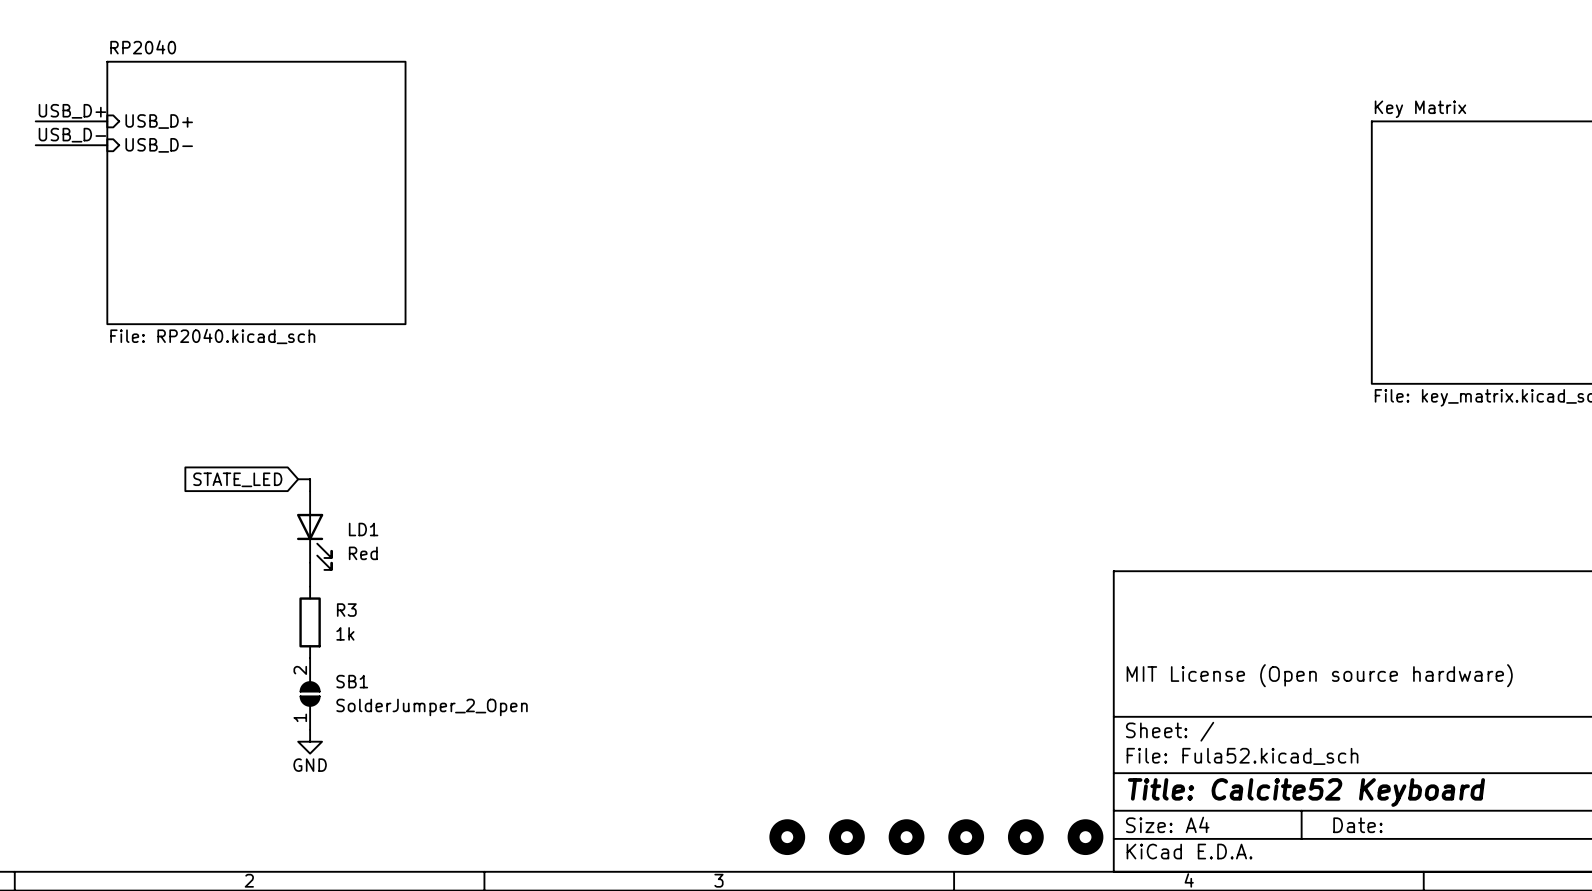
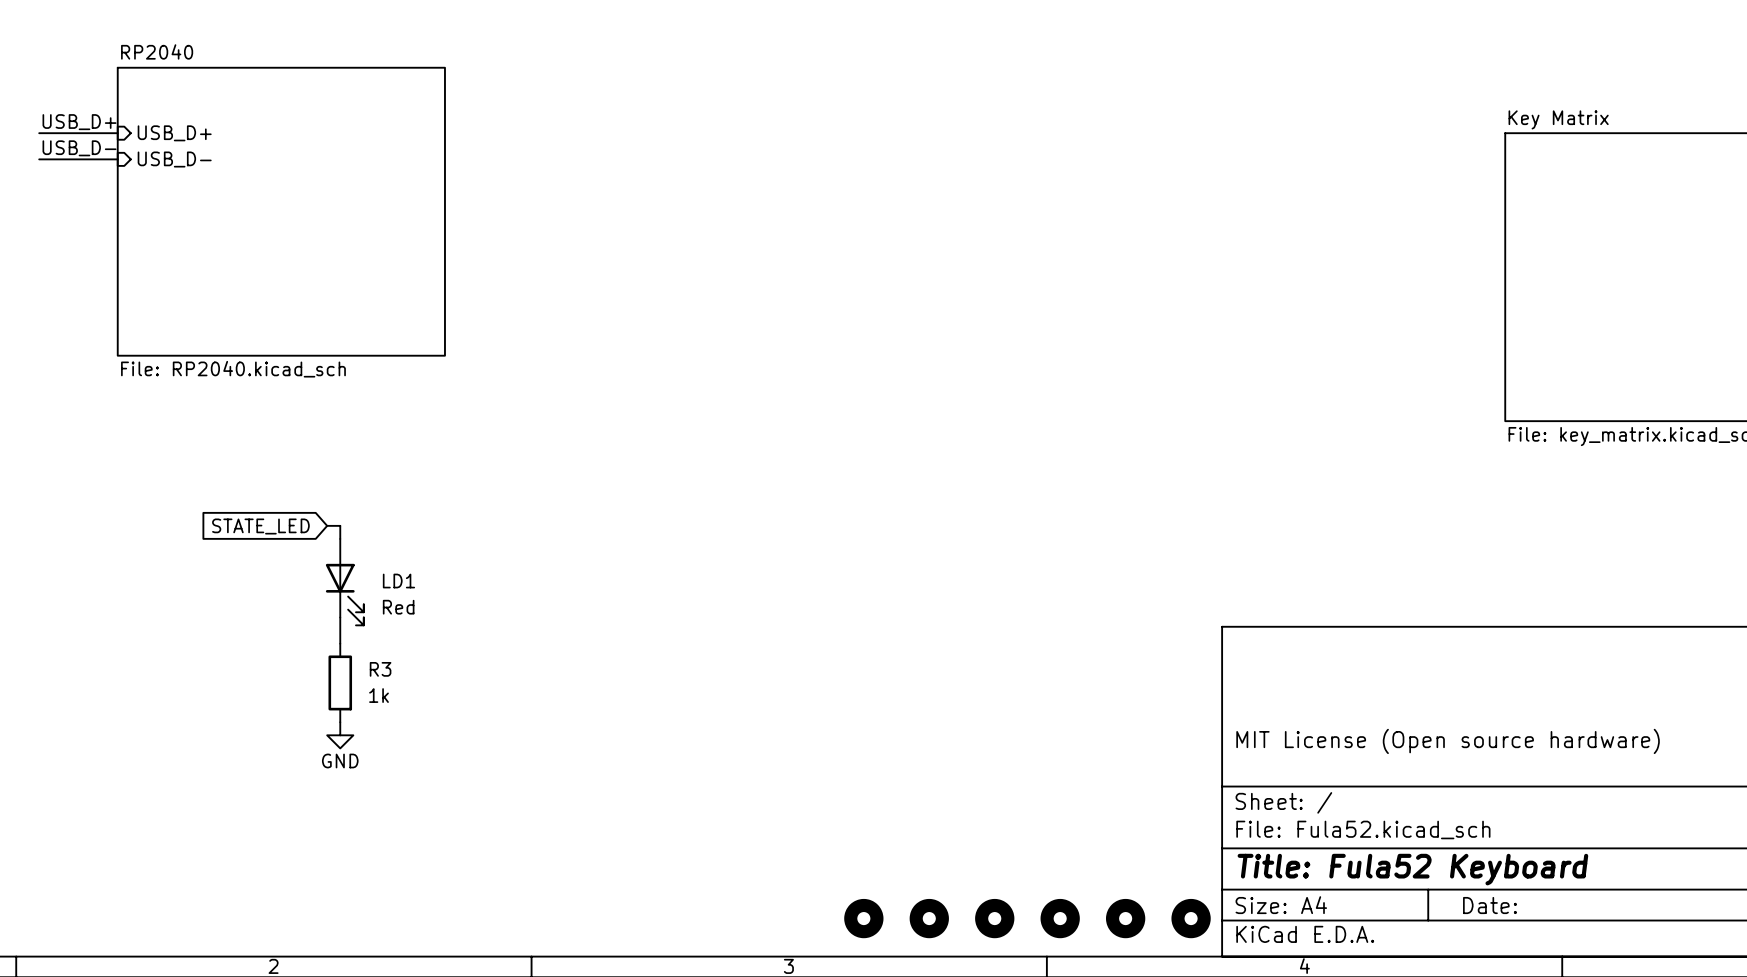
SB1: SolderJumper_2_Open (310, 693) -> none
power symbol position: GND (310, 741) -> GND (340, 735)
title block: Title: Calcite52 Keyboard (1306, 792) -> Title: Fula52 Keyboard (1412, 869)

